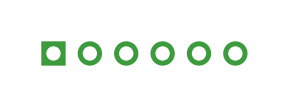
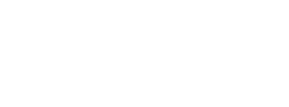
part: (144, 53) -> none

